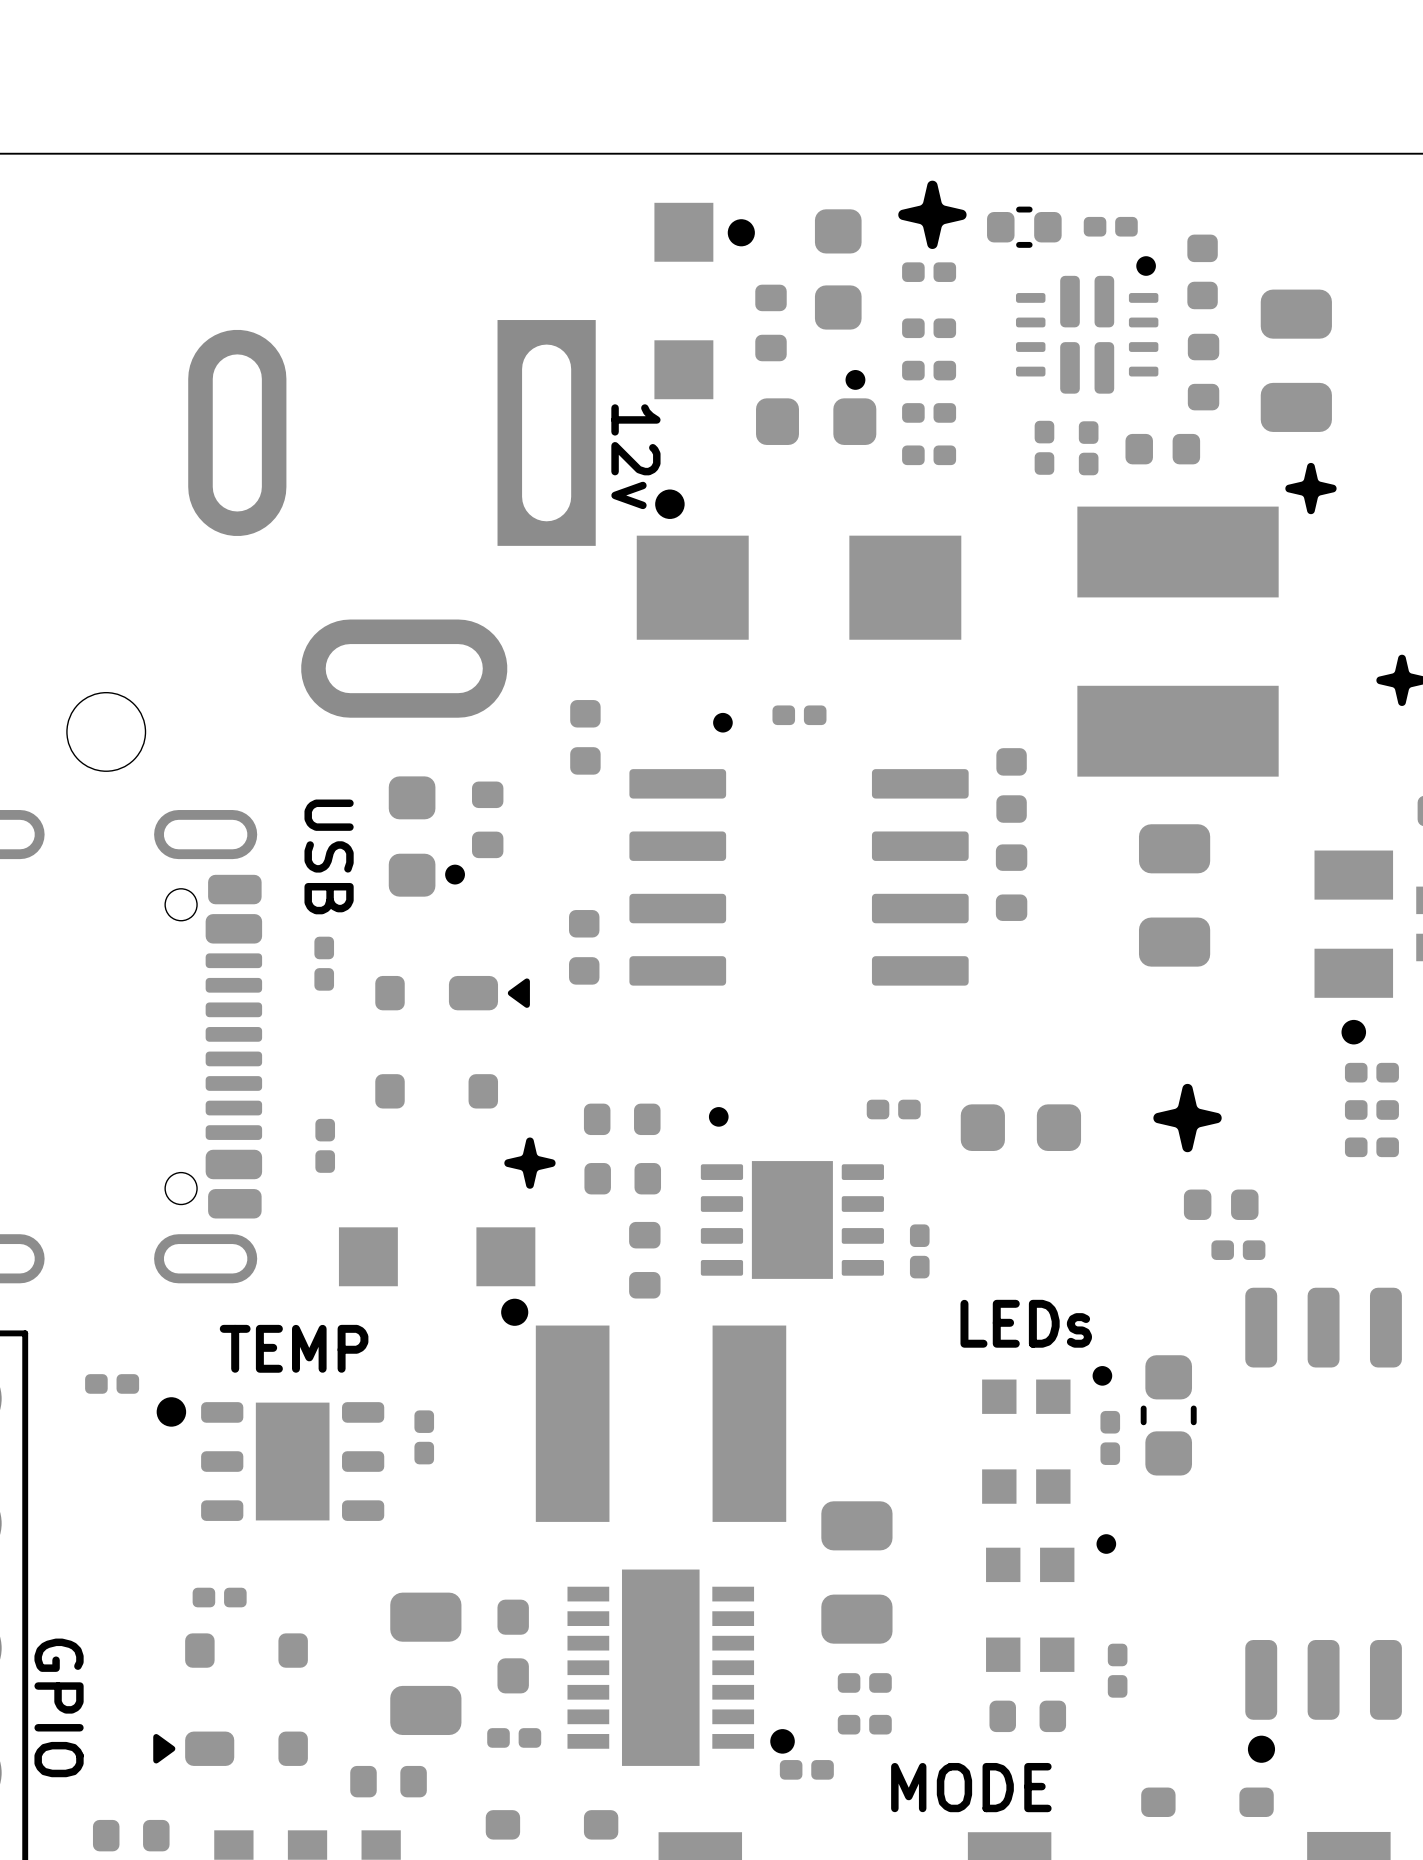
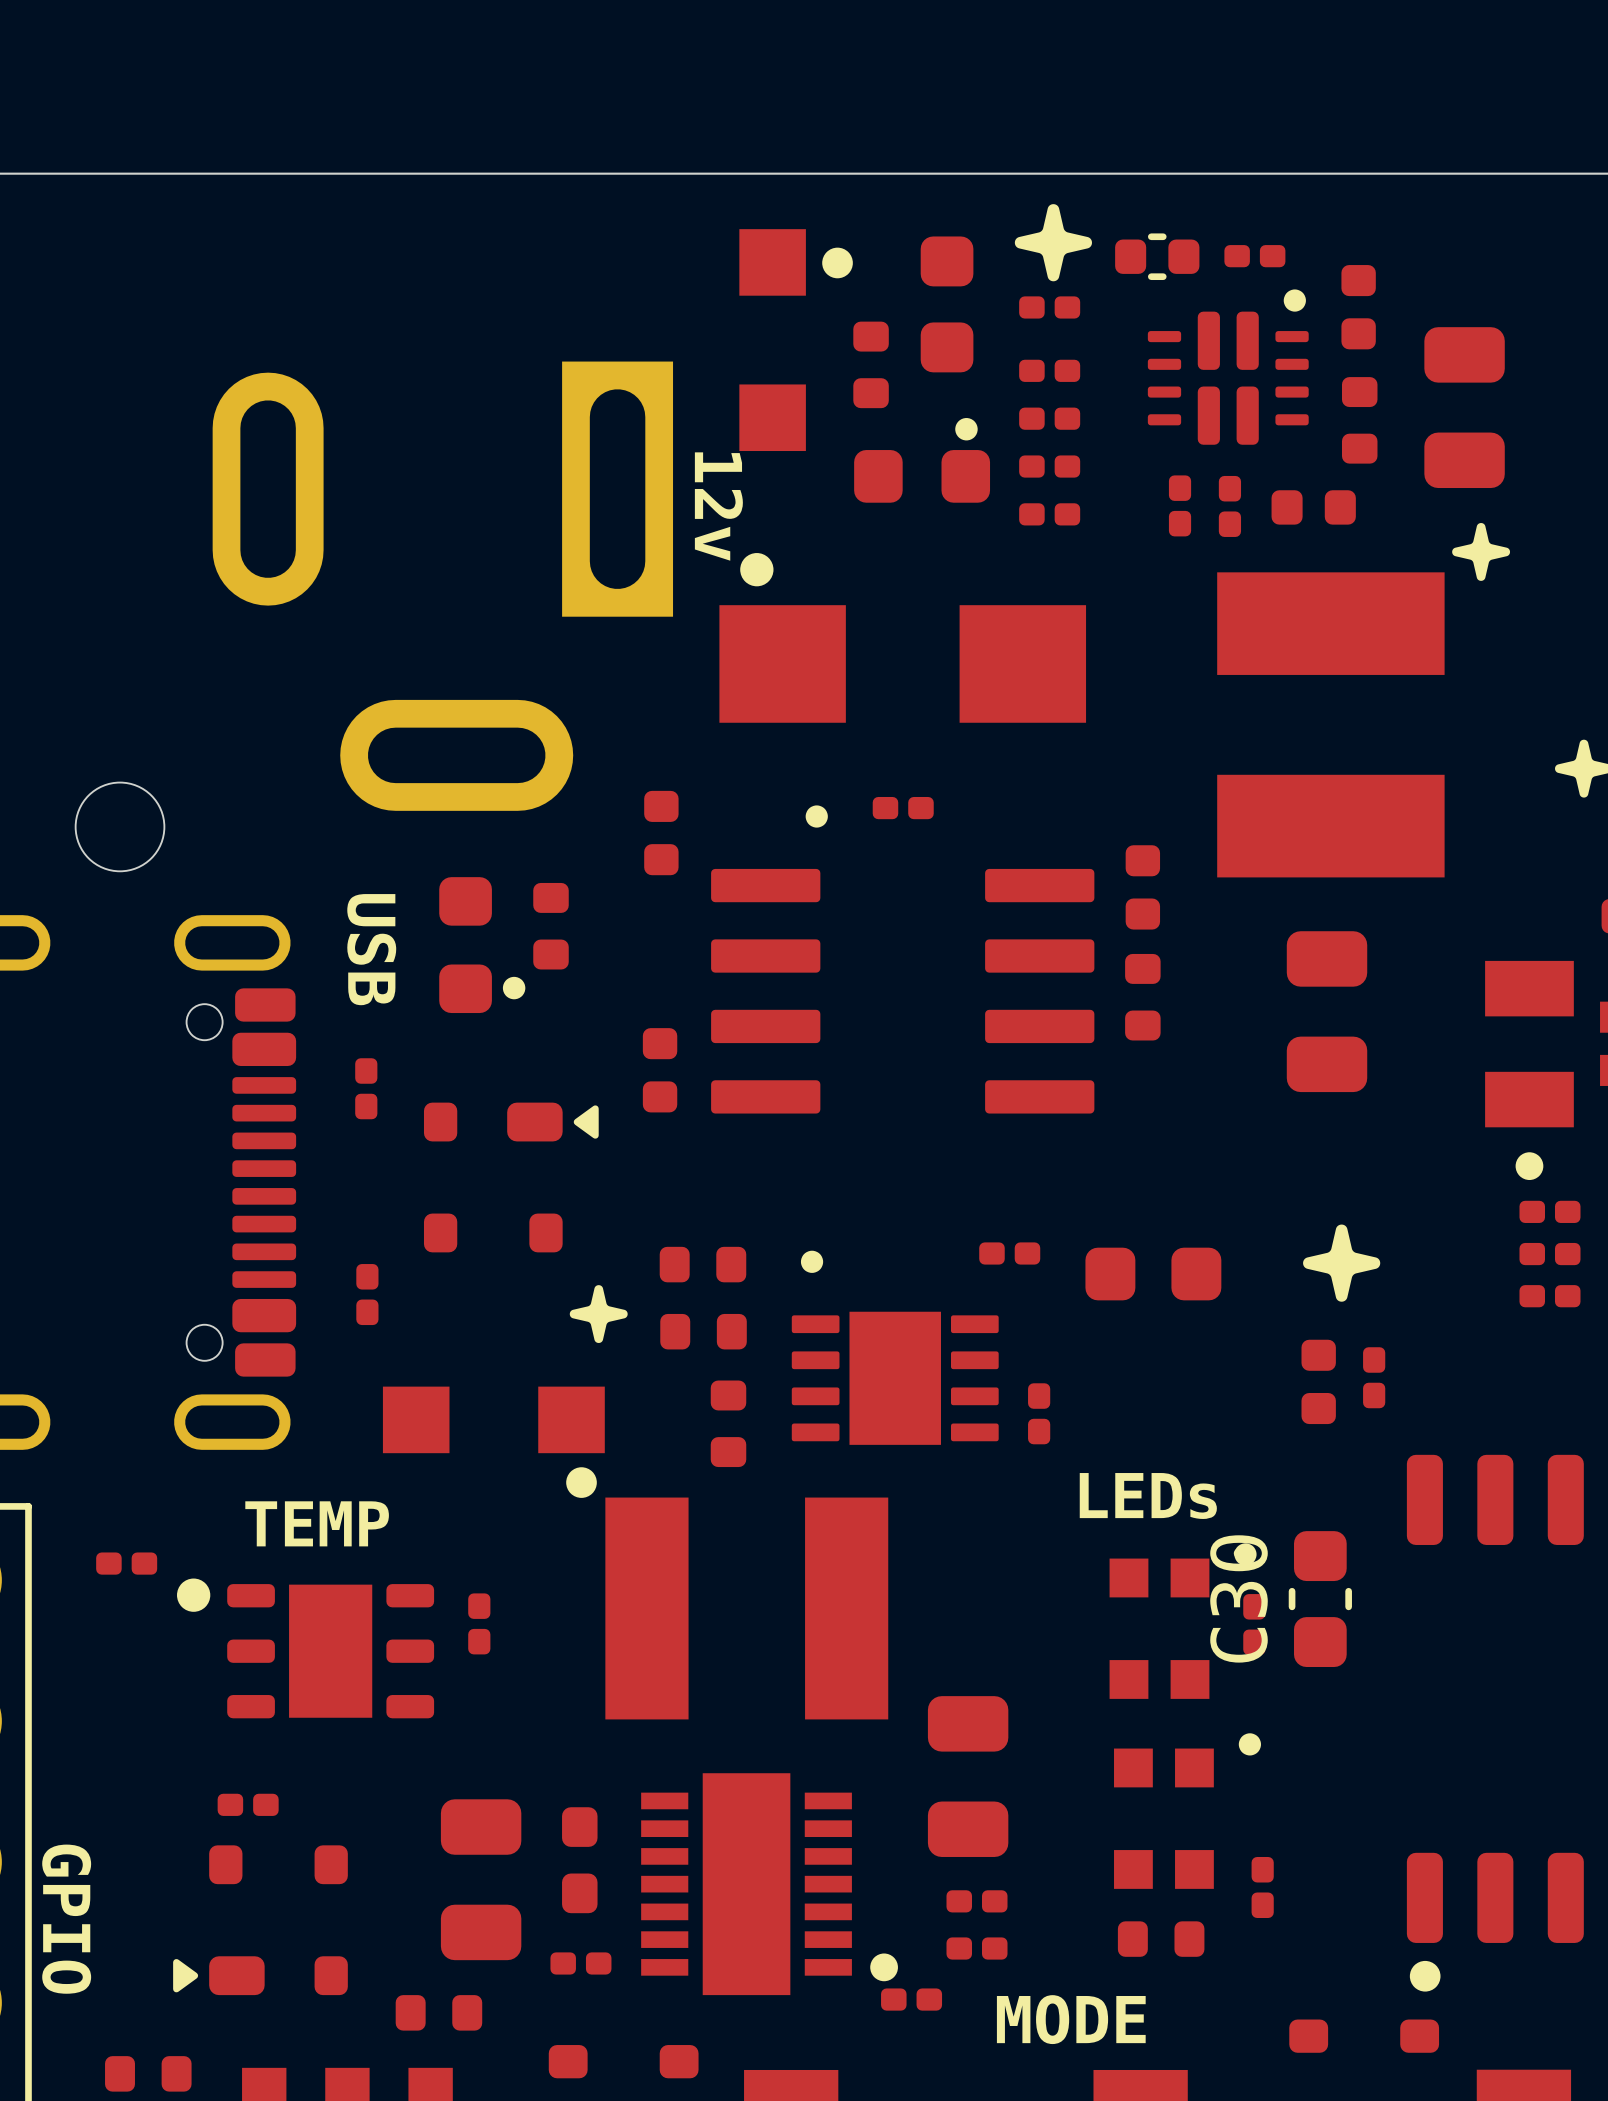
part footprint: [1183, 1189, 1259, 1220] -> [1363, 1347, 1386, 1409]
part: none -> (1318, 1381)
part: (1238, 1250) -> none
C30 name: none -> C30 (1239, 1598)

